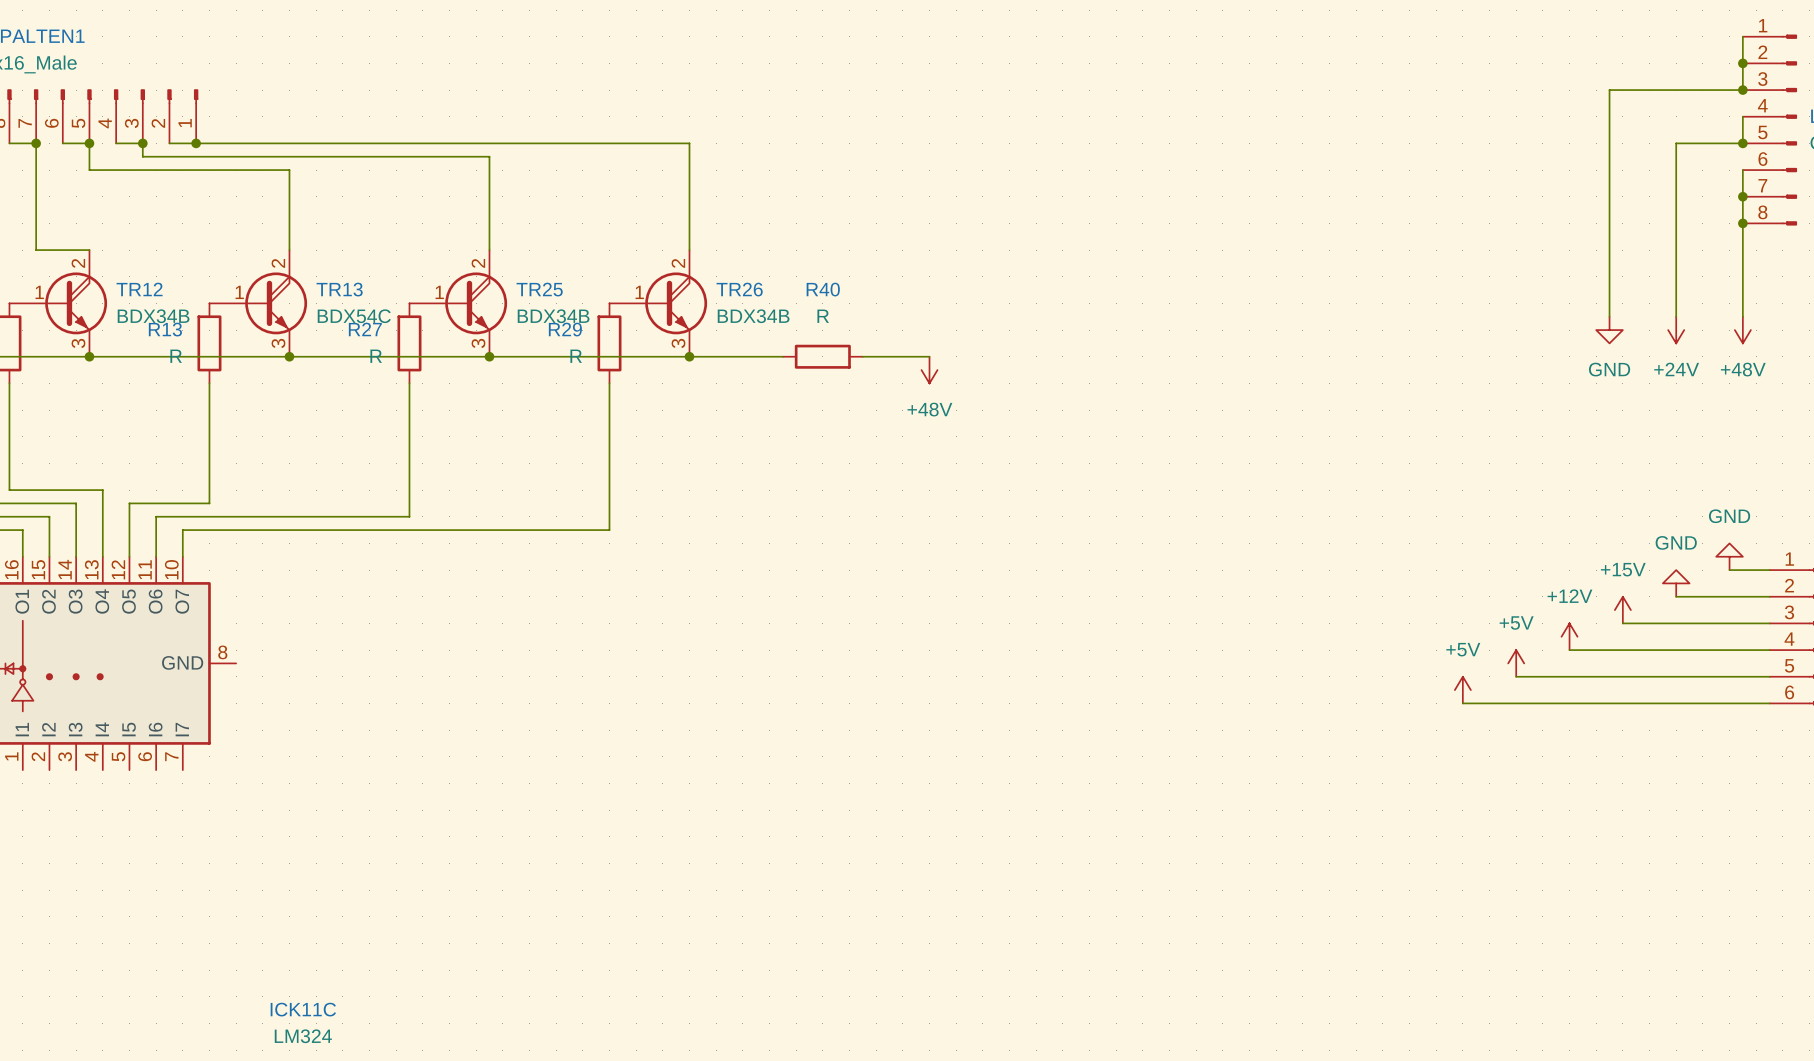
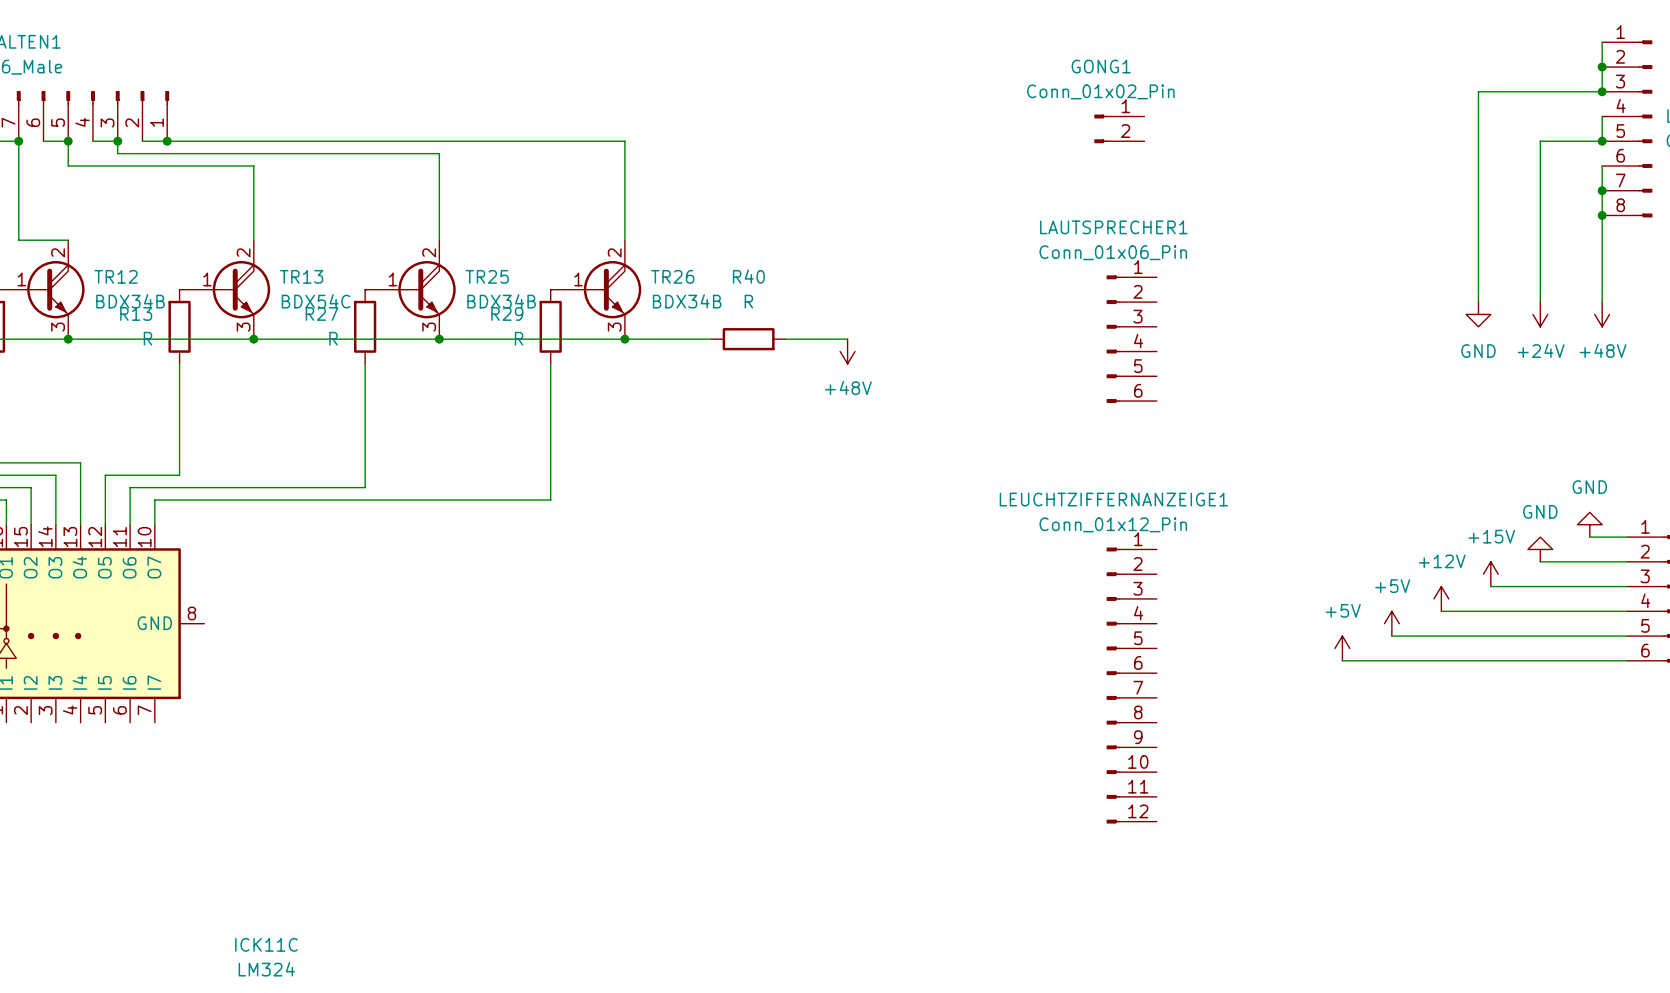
GONG1: none -> Conn_01x02_Pin (1119, 128)
LAUTSPRECHER1: none -> Conn_01x06_Pin (1131, 339)
LEUCHTZIFFERNANZEIGE1: none -> Conn_01x12_Pin (1131, 685)

